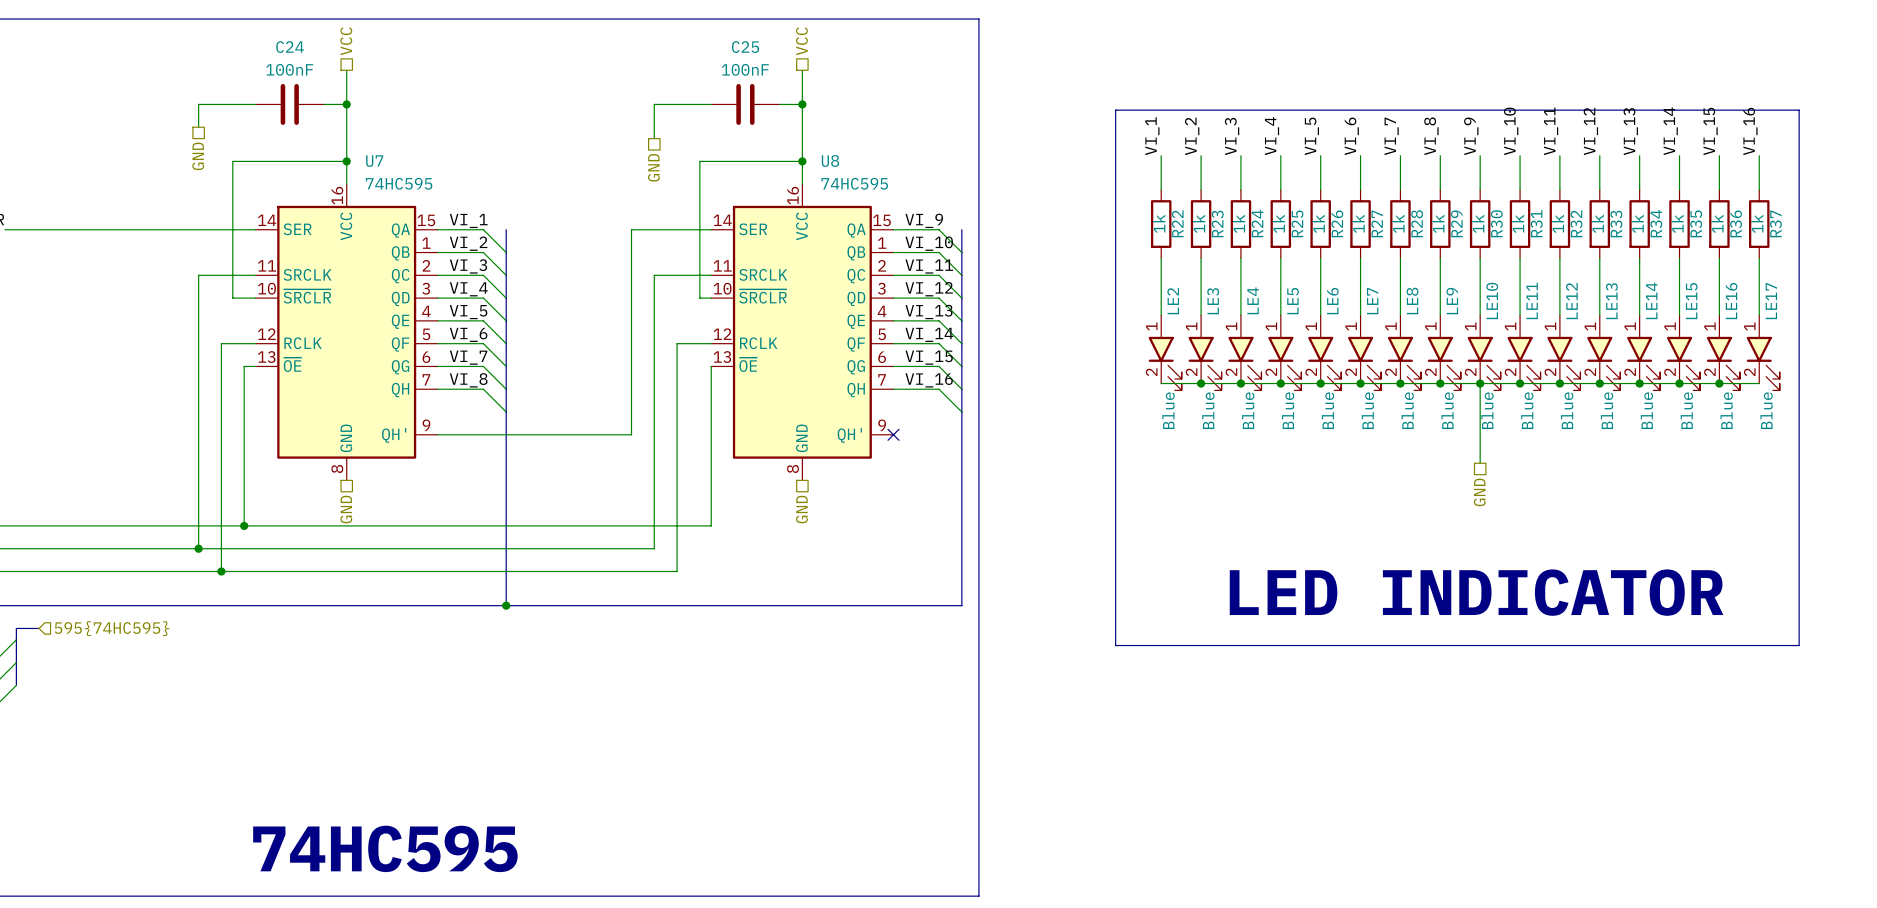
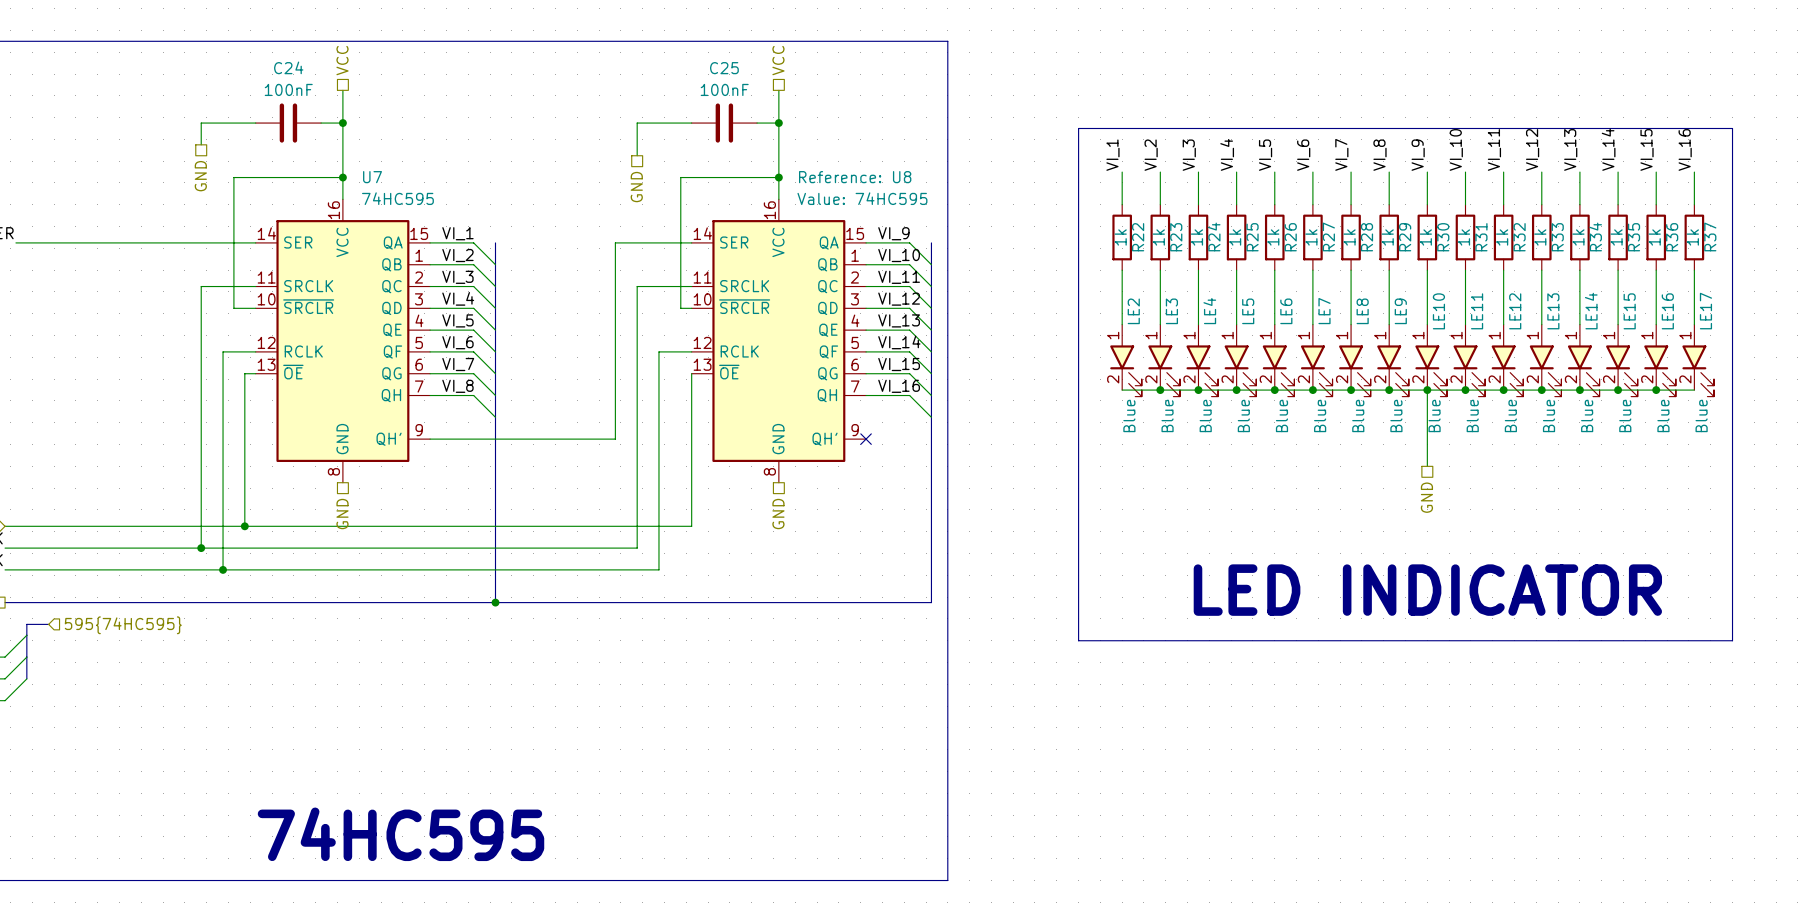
U8 name: U8 (830, 160) -> Reference: U8 (855, 177)
U8 value: 74HC595 (854, 183) -> Value: 74HC595 (862, 198)

